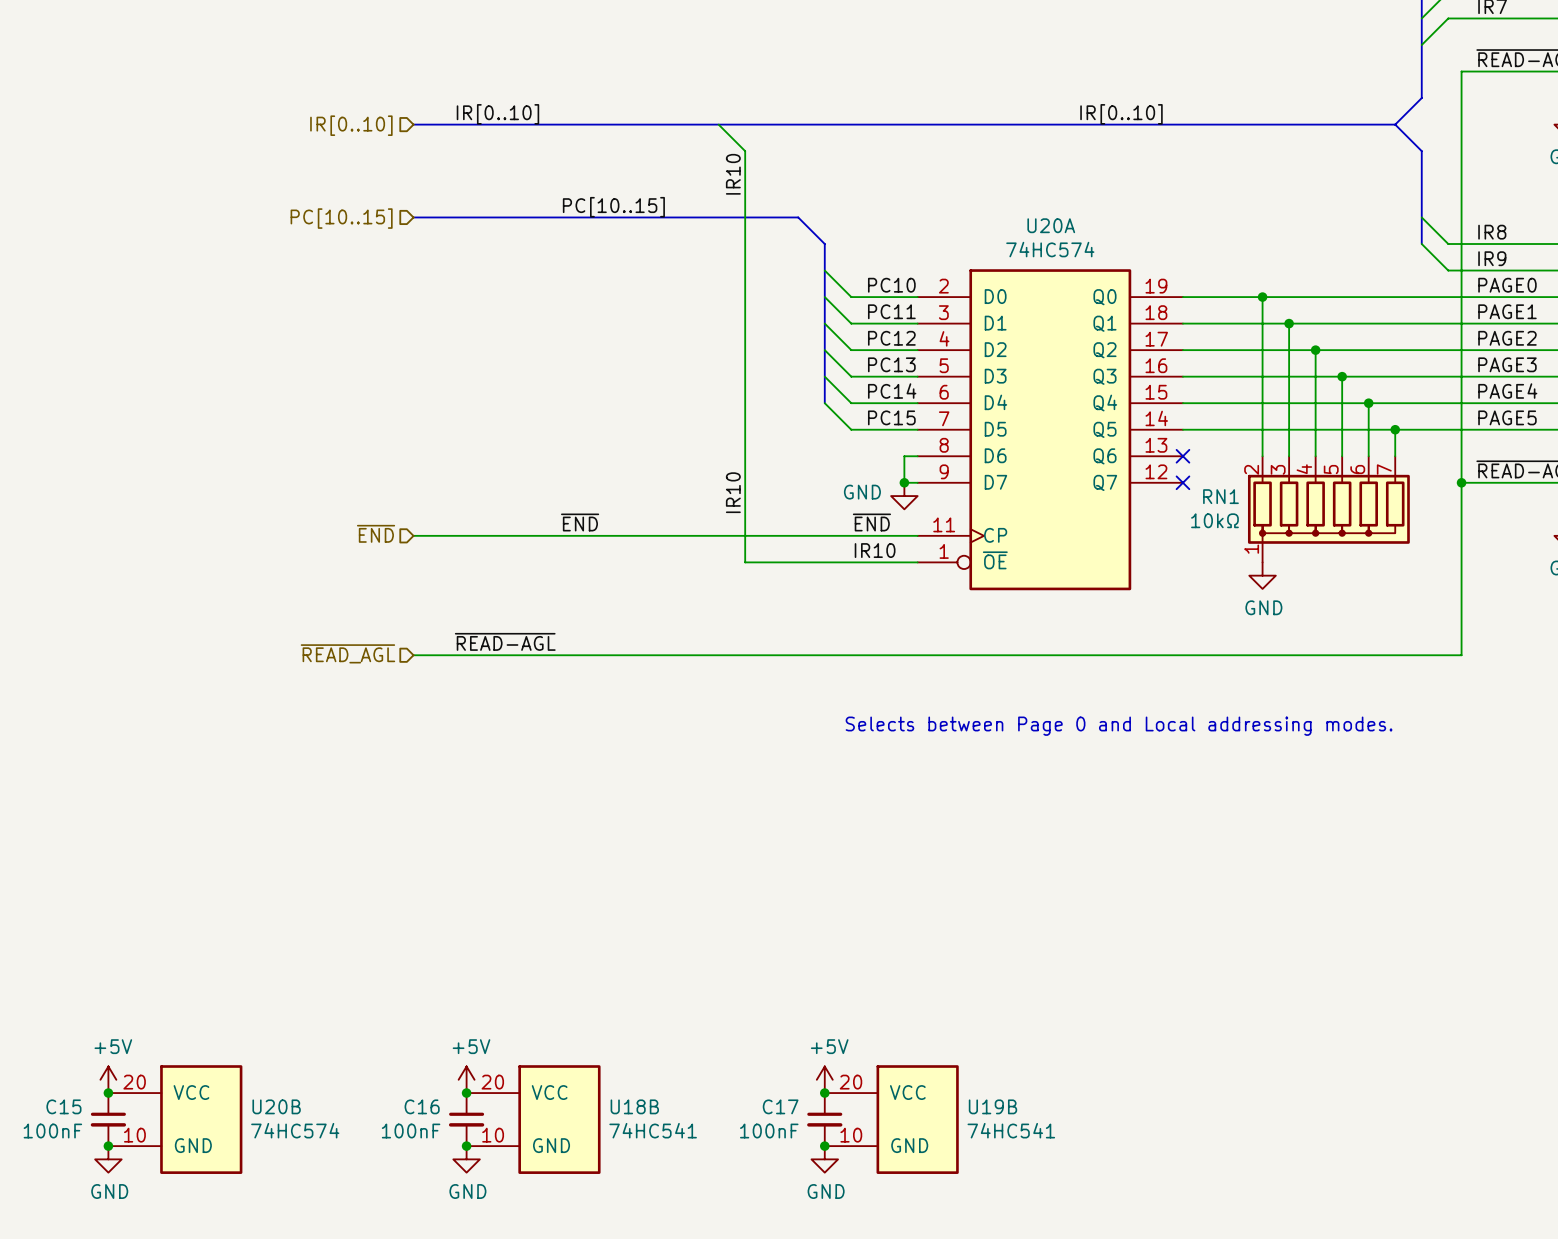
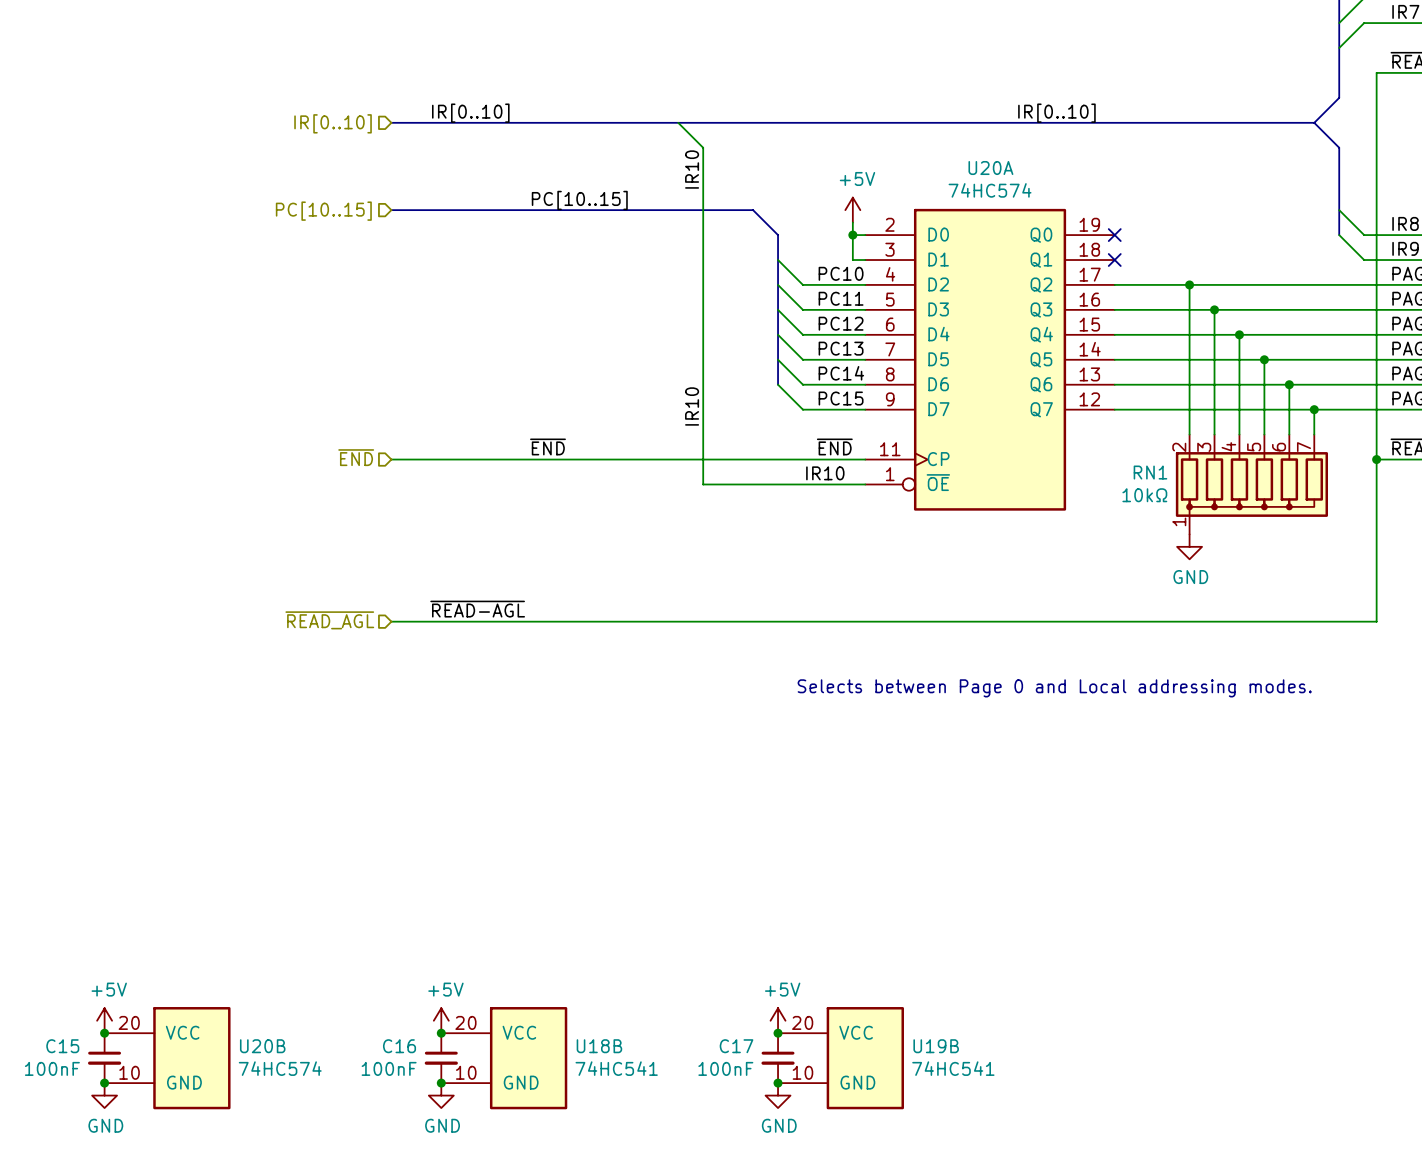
power symbol: none -> +5V (852, 210)
wire: none -> (852, 222) (852, 260) (865, 260)
wire: none -> (852, 235) (865, 235)
junction: none -> (852, 235)
no-connect mark: none -> (1114, 235)
no-connect mark: none -> (1114, 260)
label: none -> IR10 (692, 406)
U20A position: (1050, 429) -> (990, 359)
wire: (917, 456) (904, 456) (904, 482) -> (391, 459) (852, 459)
no-connect mark: (1182, 456) -> none
junction: (904, 482) -> none
no-connect mark: (1182, 482) -> none
label: IR10 (733, 492) -> none
power symbol: GND (904, 496) -> none
wire: (745, 509) (745, 562) (917, 562) -> (703, 484) (865, 484)
label position: ~{END} (580, 522) -> ~{END} (548, 446)
label position: ~{END} (871, 522) -> ~{END} (834, 446)
hierarchical label position: ~{END} (376, 533) -> ~{END} (356, 457)
wire: (413, 535) (917, 535) -> none
label position: IR10 (875, 550) -> IR10 (825, 473)

